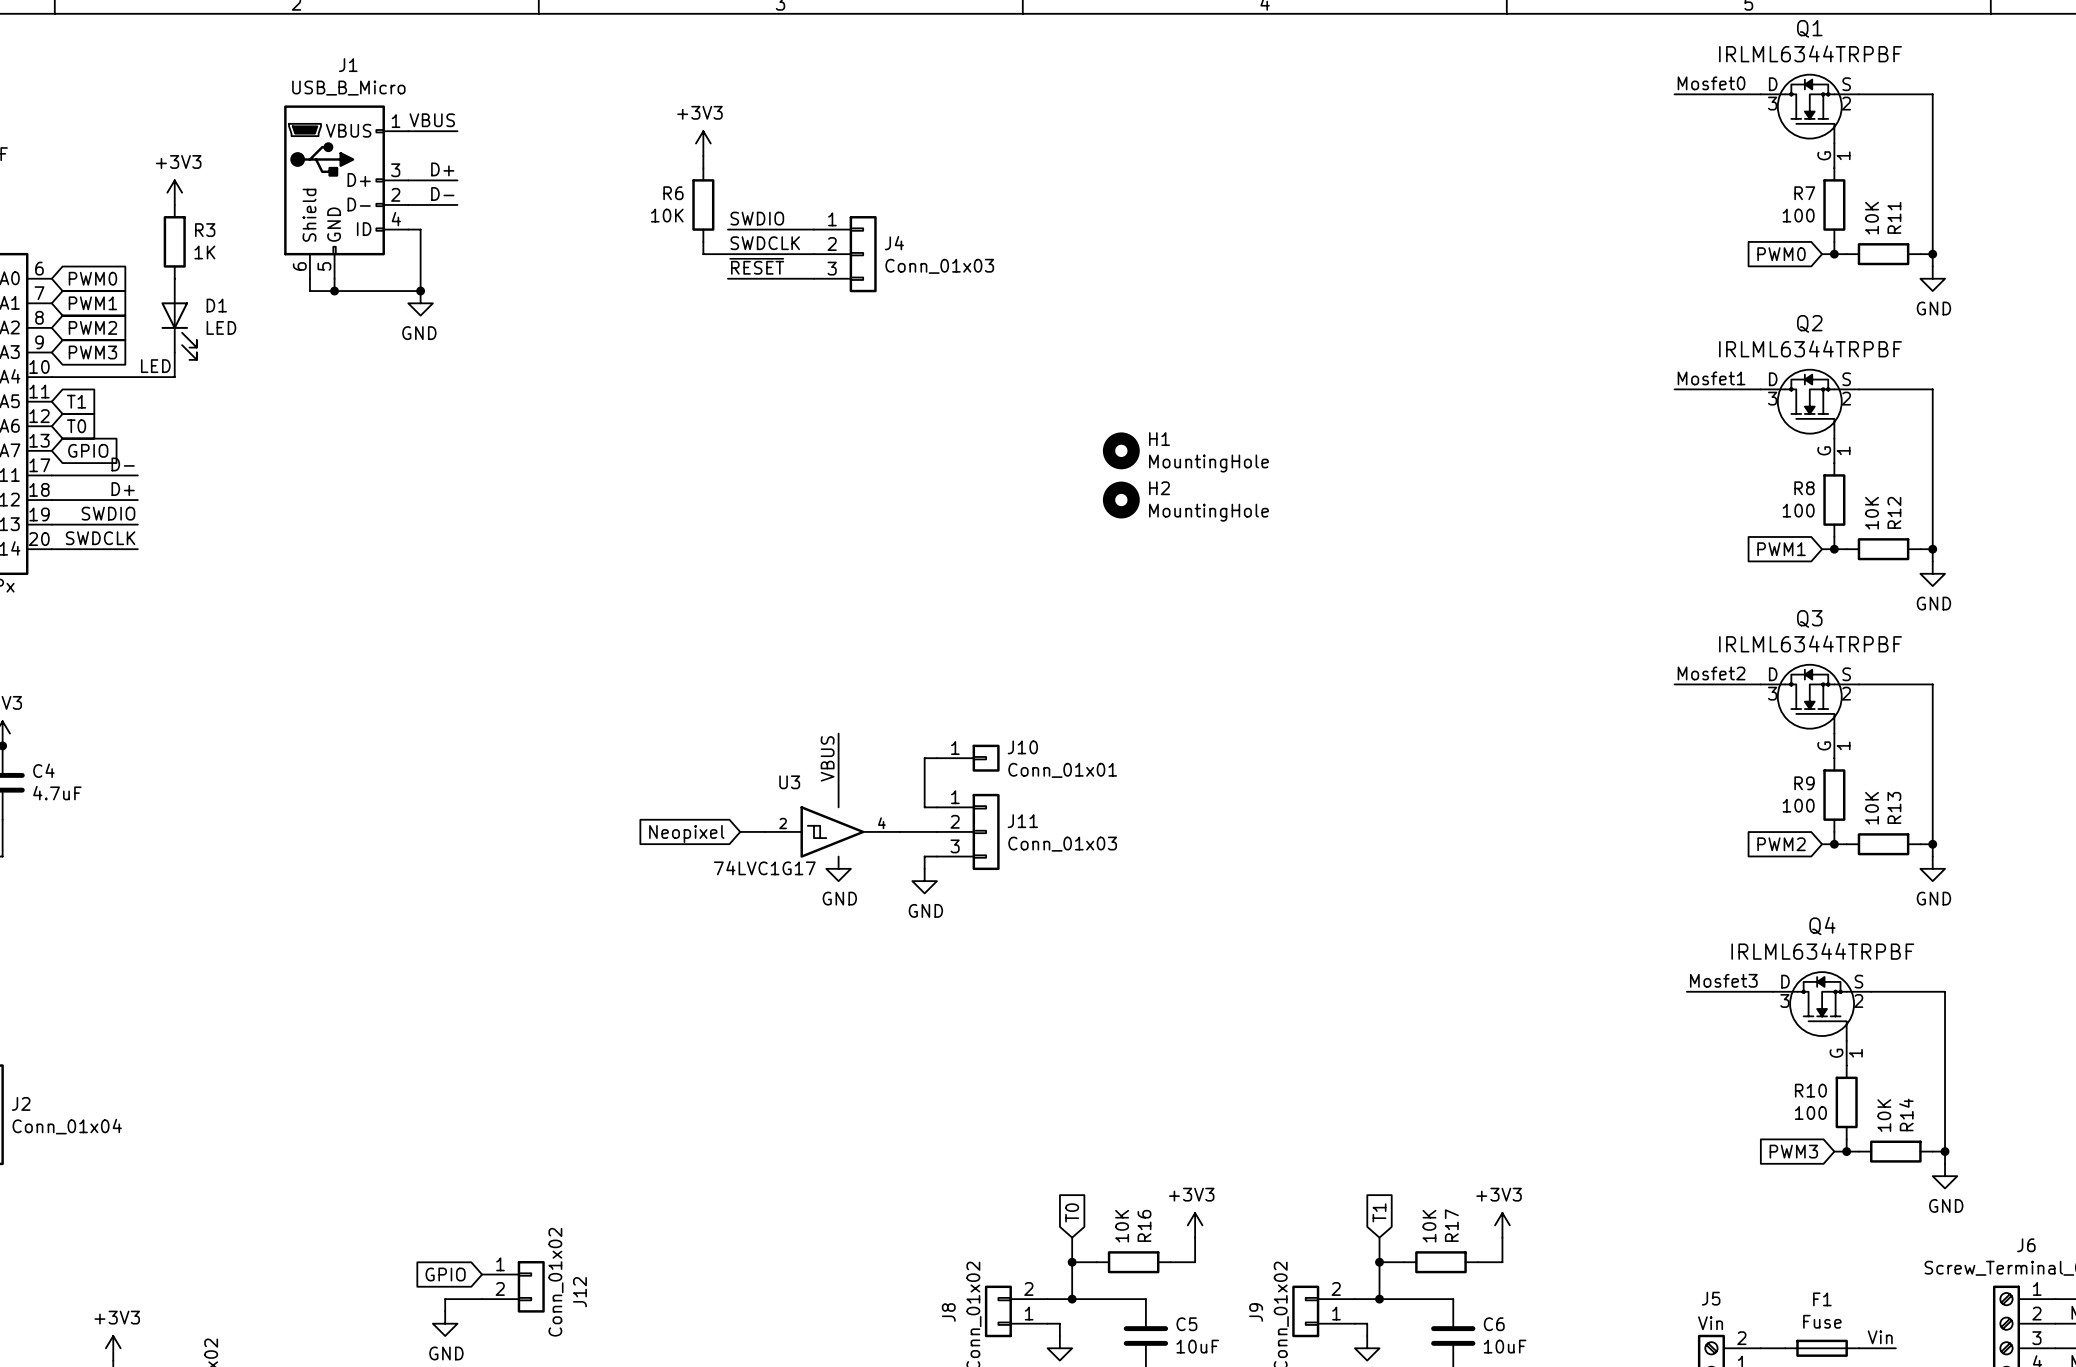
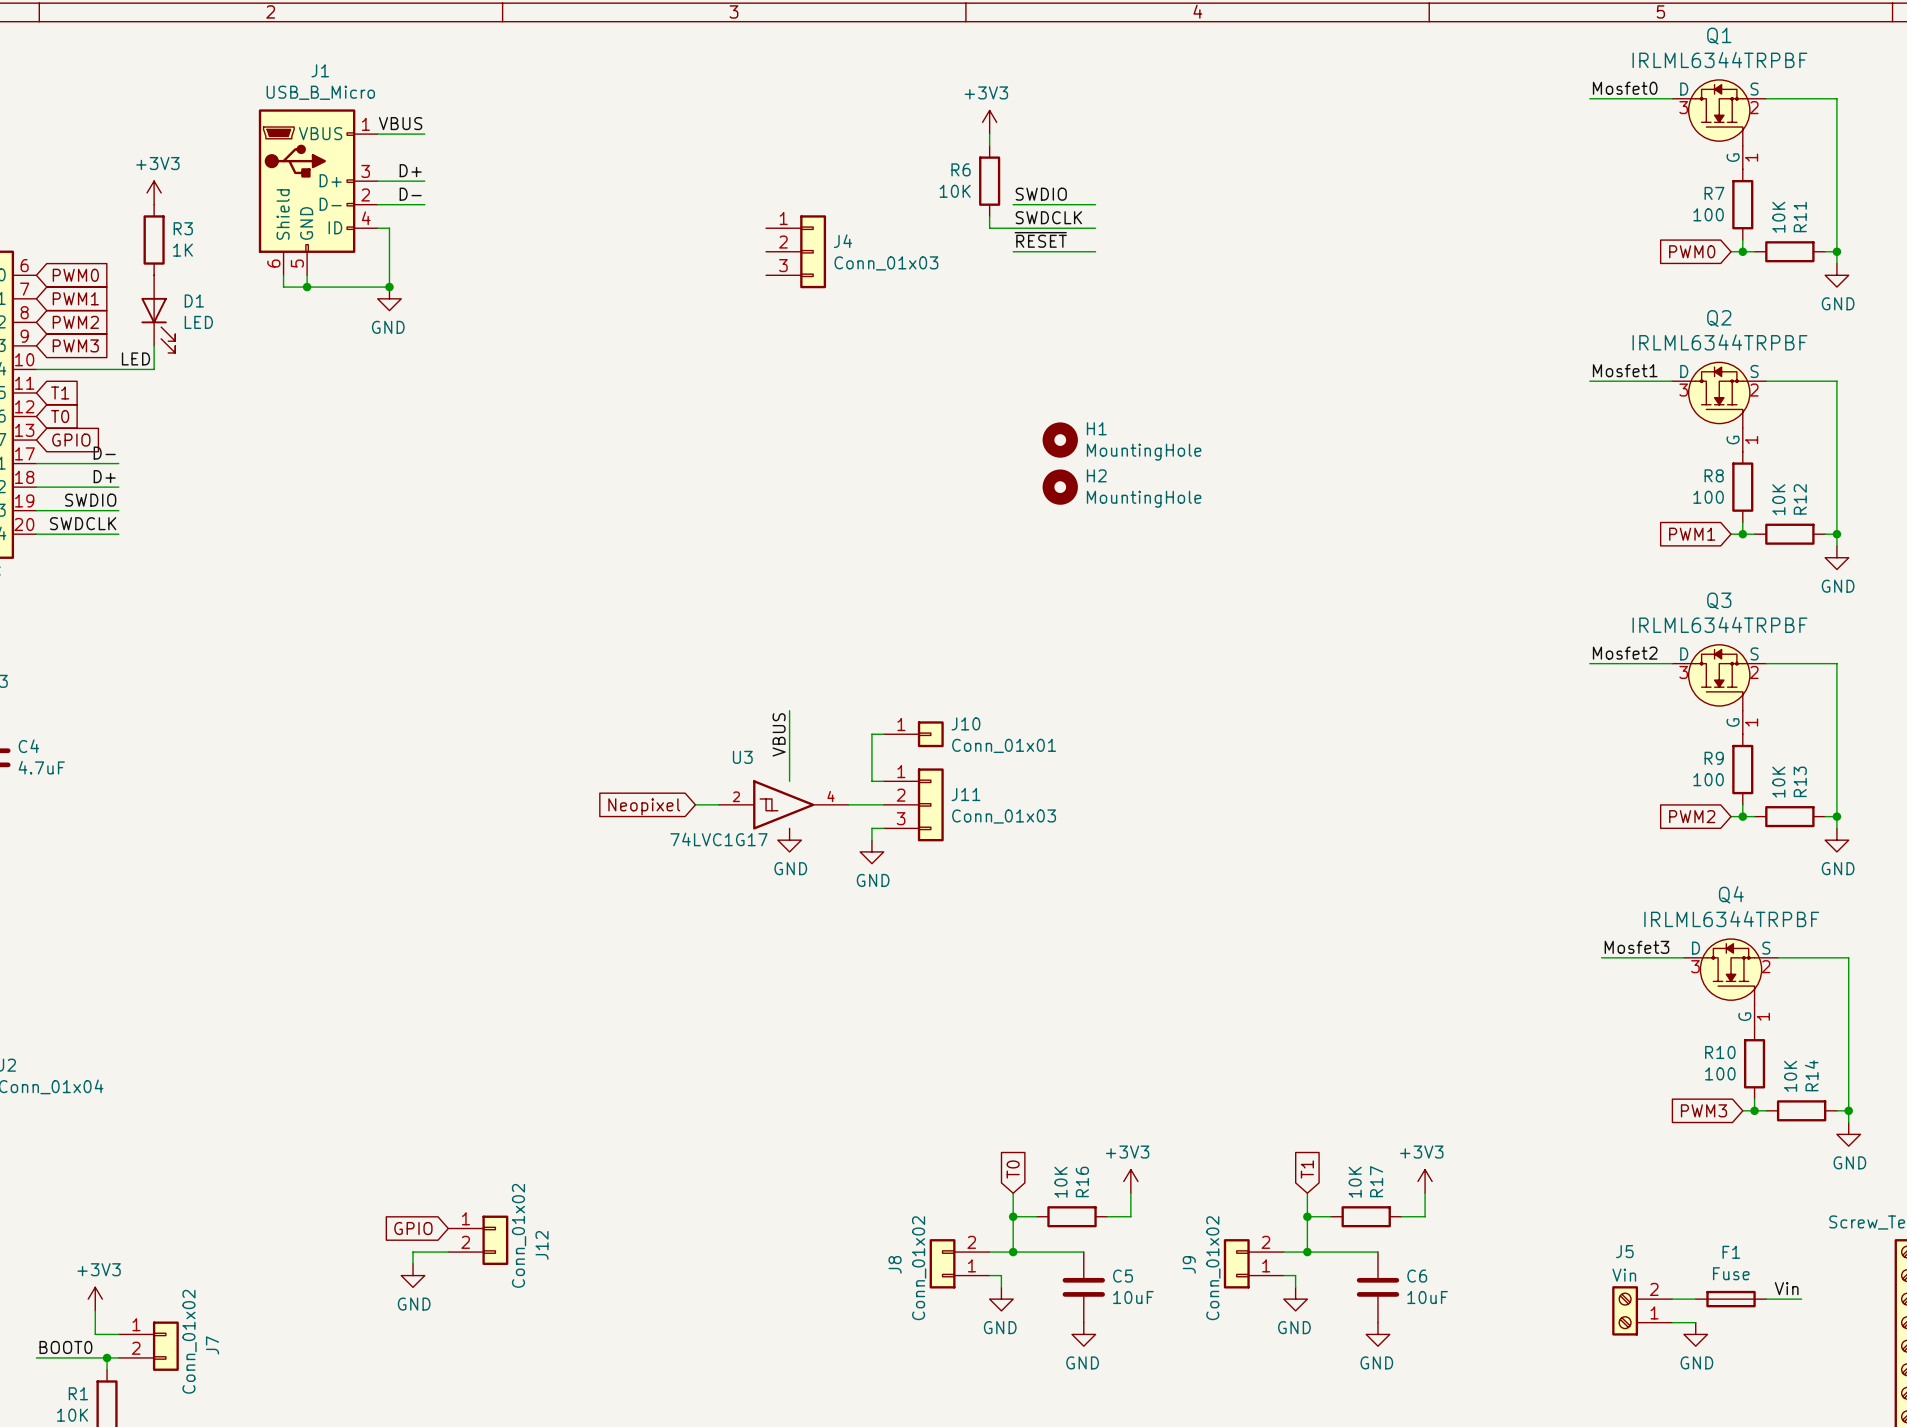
power symbol: none -> +3V3 (989, 122)
wire: none -> (989, 134) (989, 145)
power symbol: +3V3 (703, 143) -> none
wire: (703, 155) (703, 168) -> none
label: none -> SWDIO (1041, 194)
R6 position: (703, 204) -> (989, 181)
wire: none -> (1013, 204) (1095, 204)
wire: none -> (989, 216) (989, 228) (1095, 228)
label: SWDIO (757, 218) -> none
label: none -> SWDCLK (1048, 217)
wire: (727, 229) (814, 229) -> none
wire: (703, 241) (703, 254) (814, 254) -> none
label: none -> ~{RESET} (1040, 239)
label: SWDCLK (765, 243) -> none
wire: none -> (1013, 251) (1095, 251)
label: ~{RESET} (756, 266) -> none
wire: (727, 278) (814, 278) -> none

